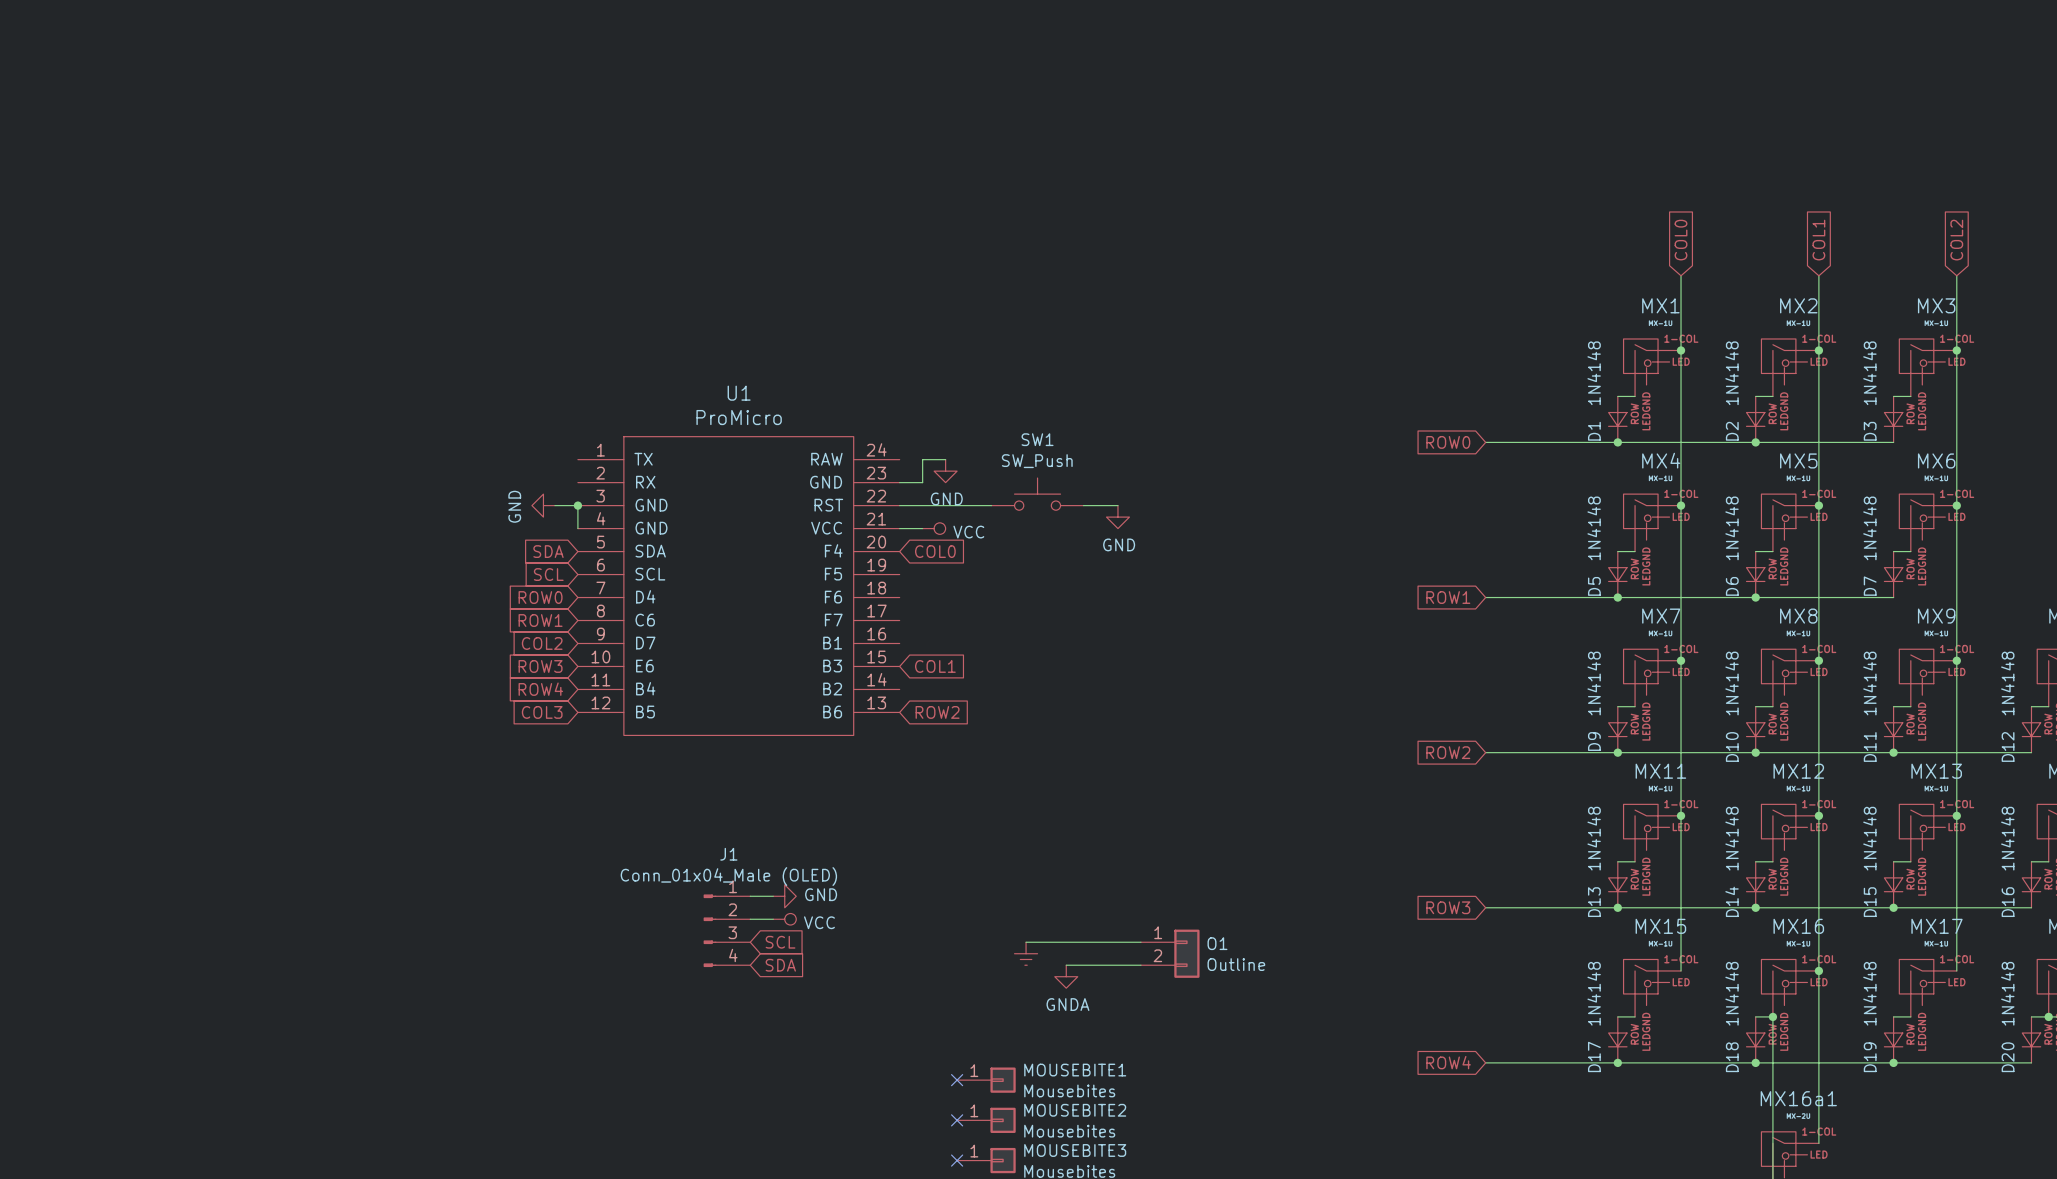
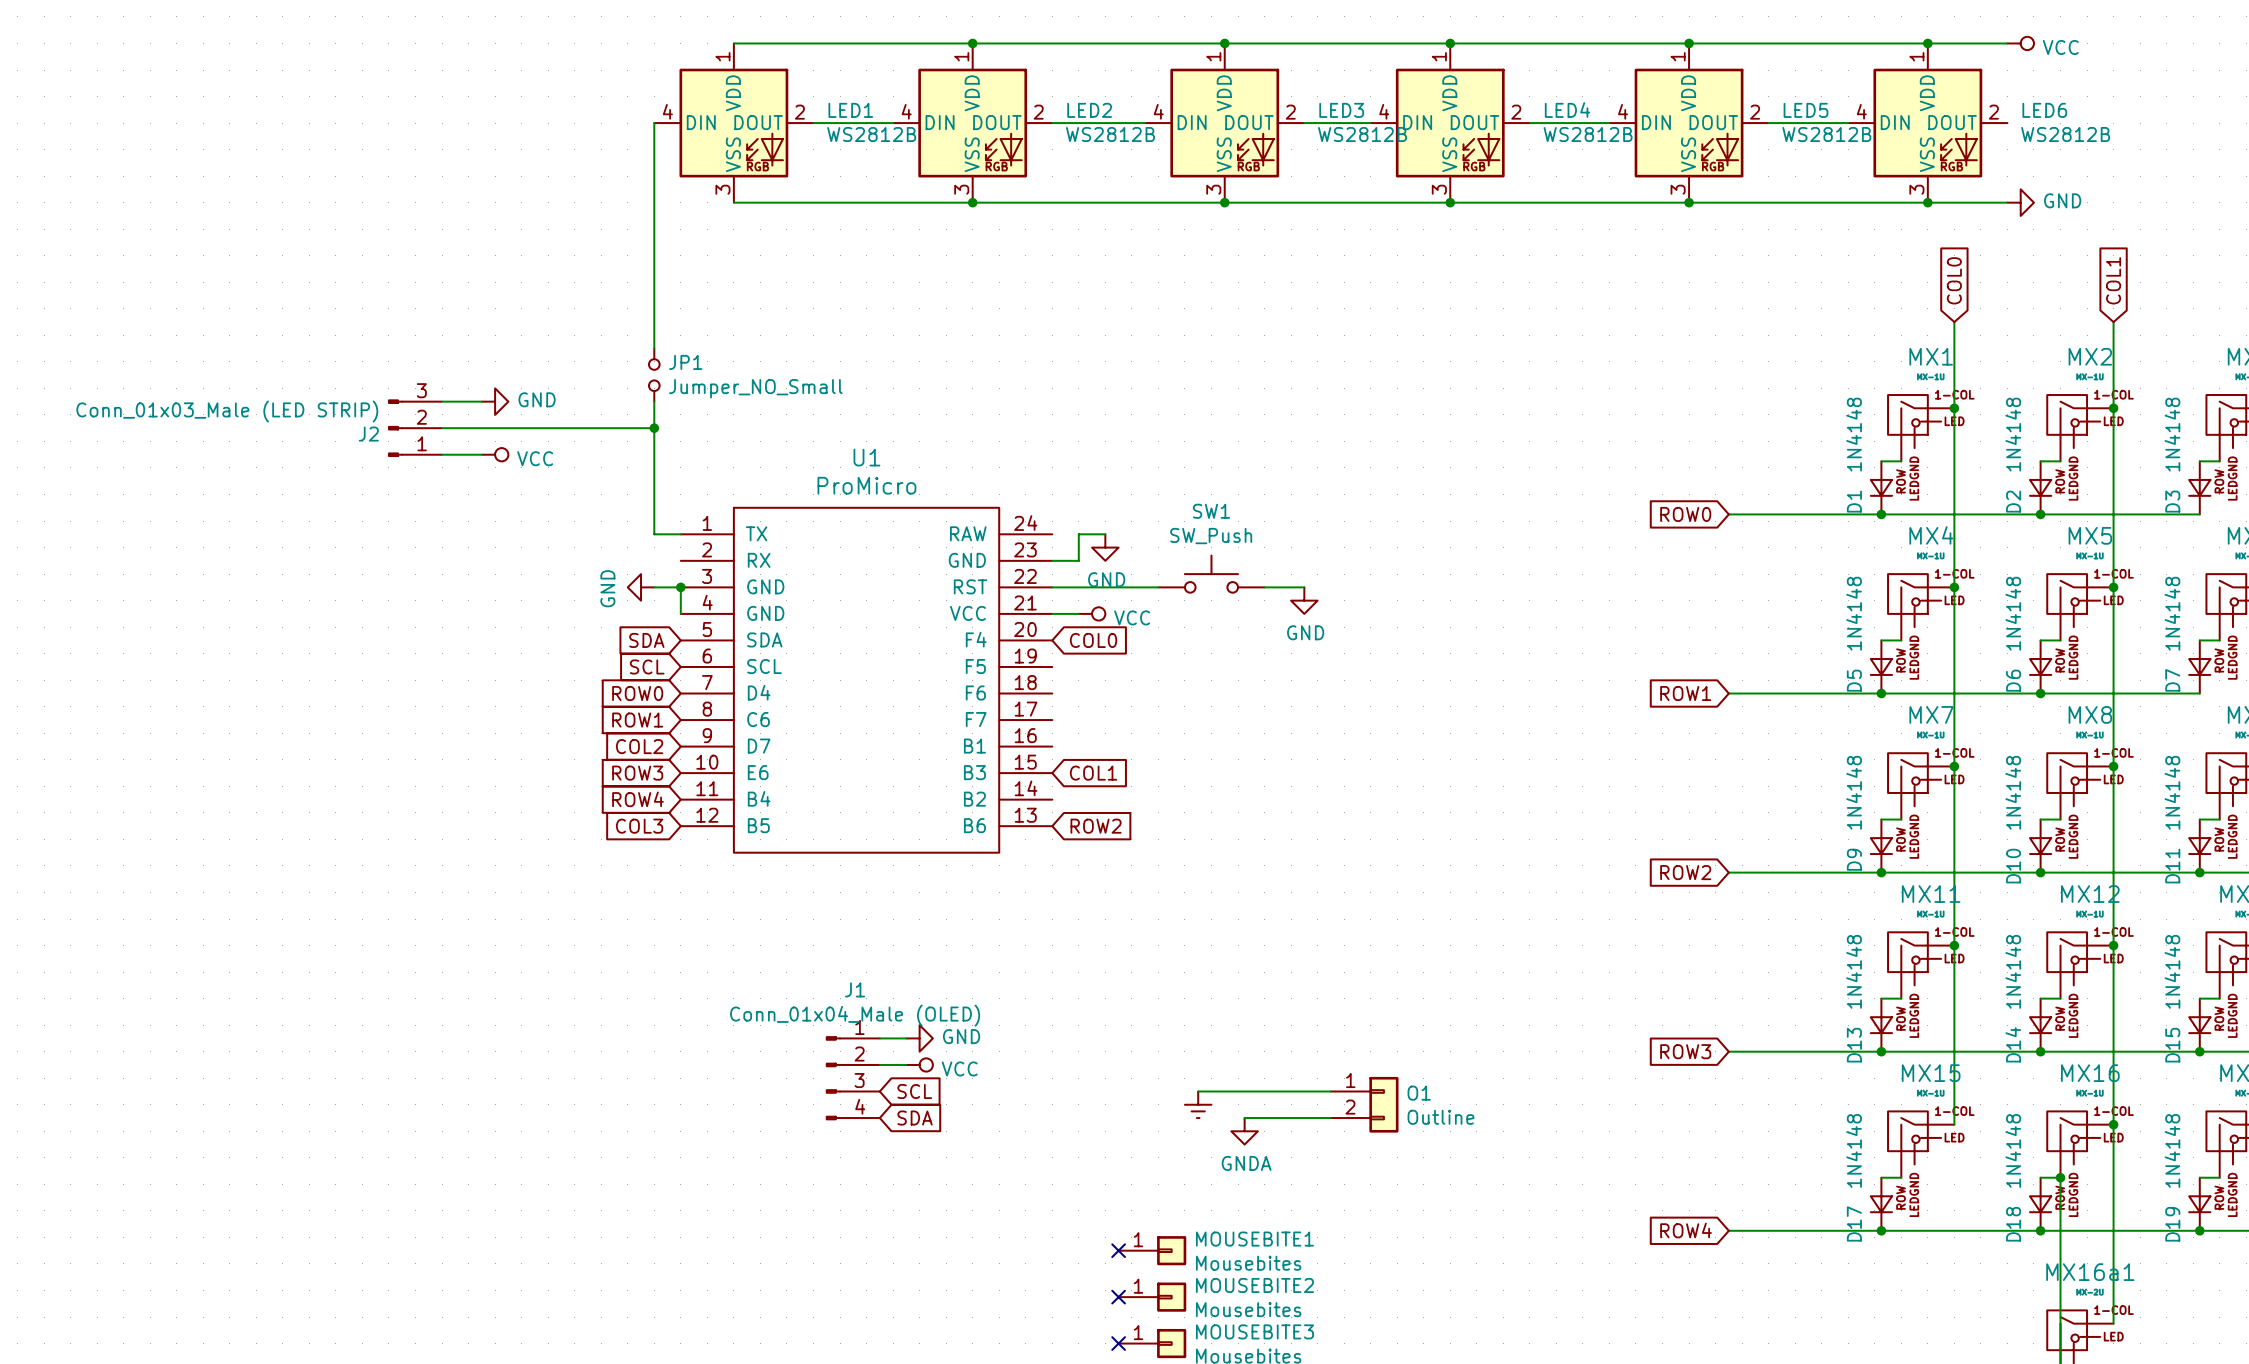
wire: none -> (733, 43) (2007, 43)
junction: none -> (972, 43)
junction: none -> (1224, 43)
junction: none -> (1450, 43)
junction: none -> (1689, 43)
junction: none -> (1927, 43)
power symbol: none -> VCC (2020, 43)
wire: none -> (654, 123) (654, 348)
LED1: none -> WS2812B (733, 123)
wire: none -> (813, 123) (893, 123)
LED2: none -> WS2812B (972, 123)
wire: none -> (1052, 123) (1145, 123)
LED3: none -> WS2812B (1224, 123)
wire: none -> (1304, 123) (1370, 123)
LED4: none -> WS2812B (1450, 123)
wire: none -> (1529, 123) (1609, 123)
LED5: none -> WS2812B (1689, 123)
wire: none -> (1768, 123) (1848, 123)
LED6: none -> WS2812B (1927, 123)
wire: none -> (733, 202) (2007, 202)
junction: none -> (972, 202)
junction: none -> (1224, 202)
junction: none -> (1450, 202)
junction: none -> (1689, 202)
junction: none -> (1927, 202)
power symbol: none -> GND (2020, 202)
JP1: none -> Jumper_NO_Small (654, 375)
wire: none -> (442, 401) (481, 401)
power symbol: none -> GND (495, 401)
wire: none -> (654, 401) (654, 534) (680, 534)
J2: none -> Conn_01x03_Male (LED STRIP) (415, 428)
wire: none -> (442, 428) (654, 428)
junction: none -> (654, 428)
wire: none -> (442, 454) (481, 454)
power symbol: none -> VCC (495, 454)

